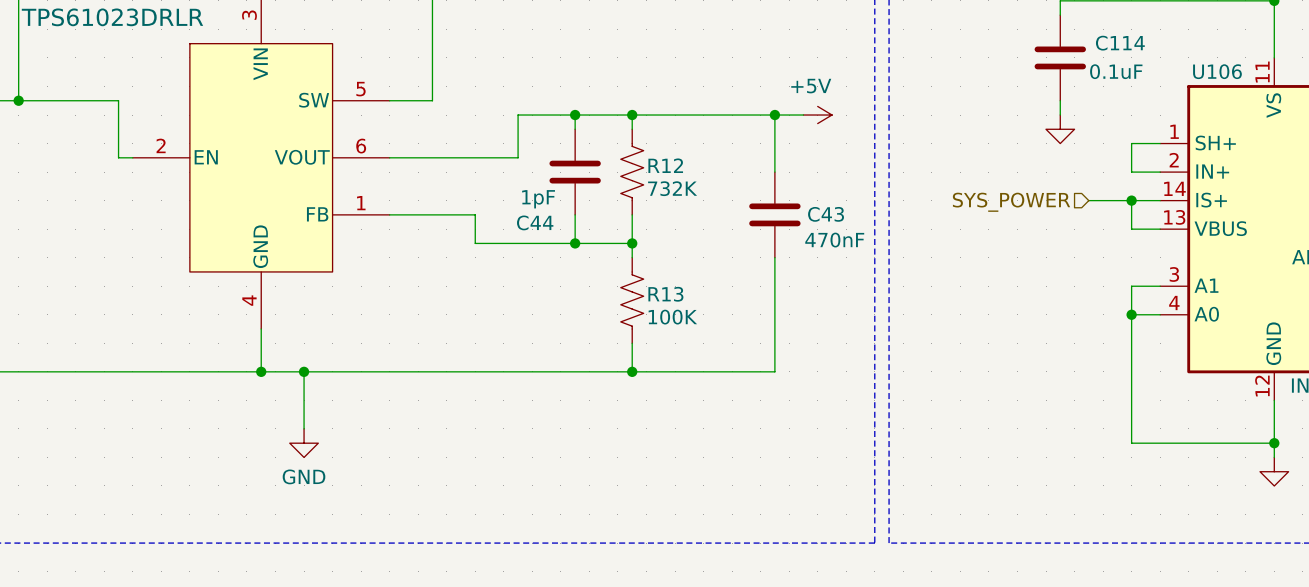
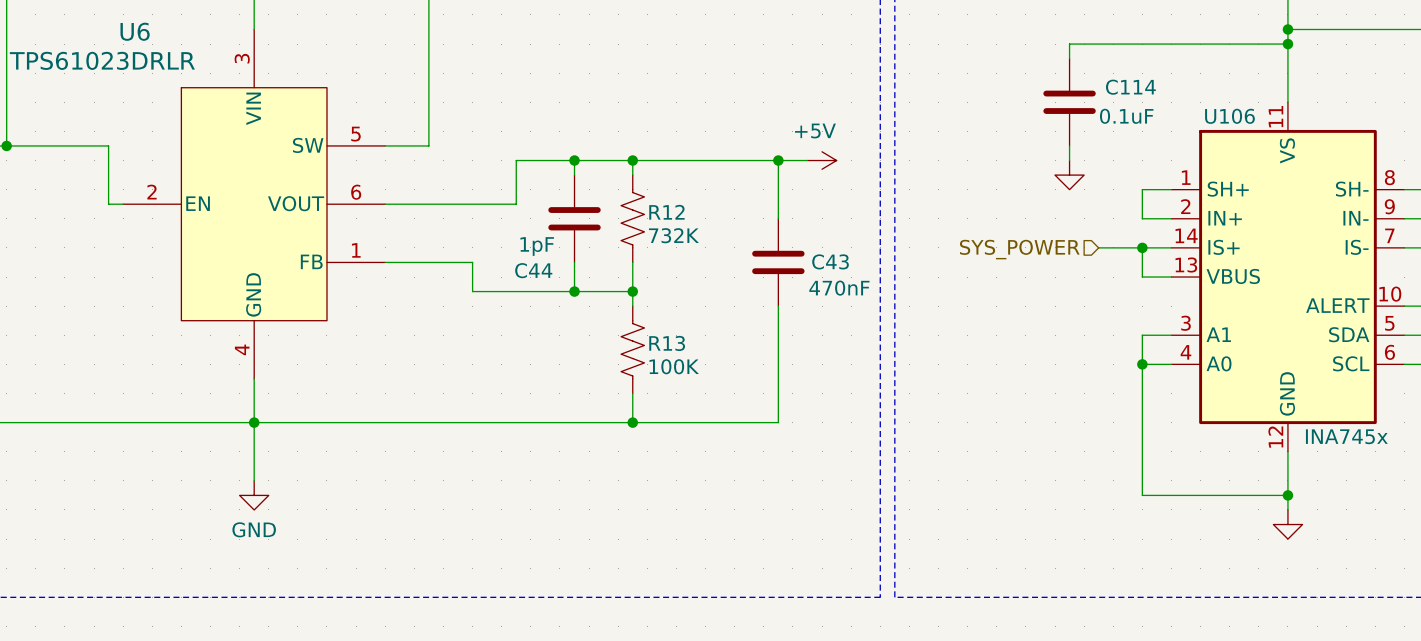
wire: (304, 371) (304, 428) -> (254, 422) (254, 480)
junction: (304, 371) -> none
power symbol position: GND (304, 443) -> GND (254, 495)

